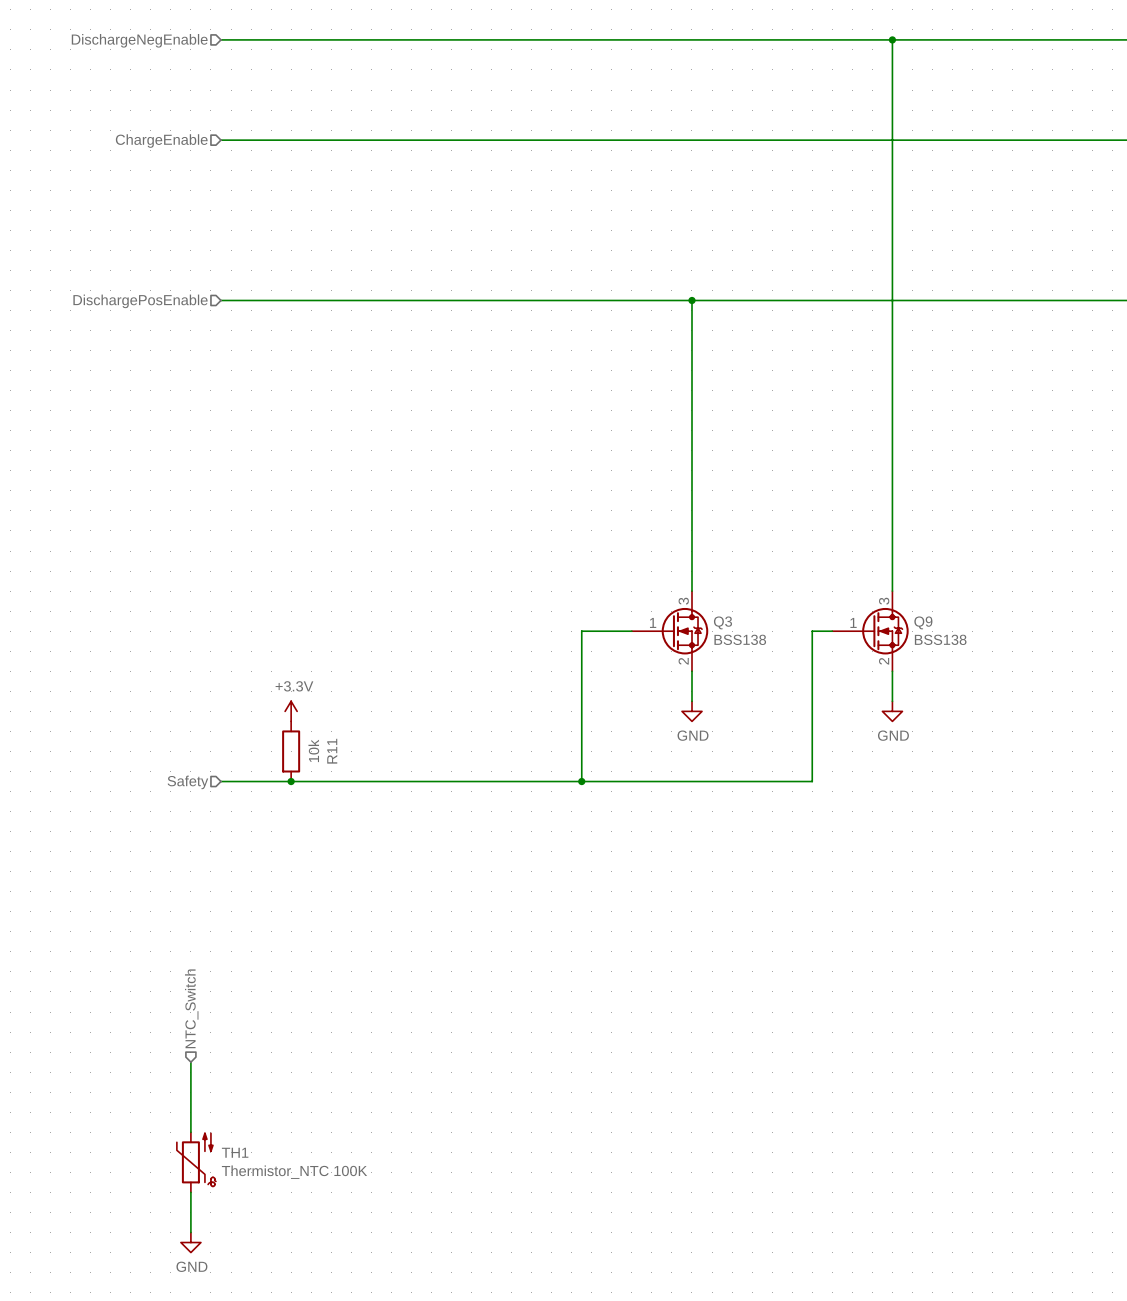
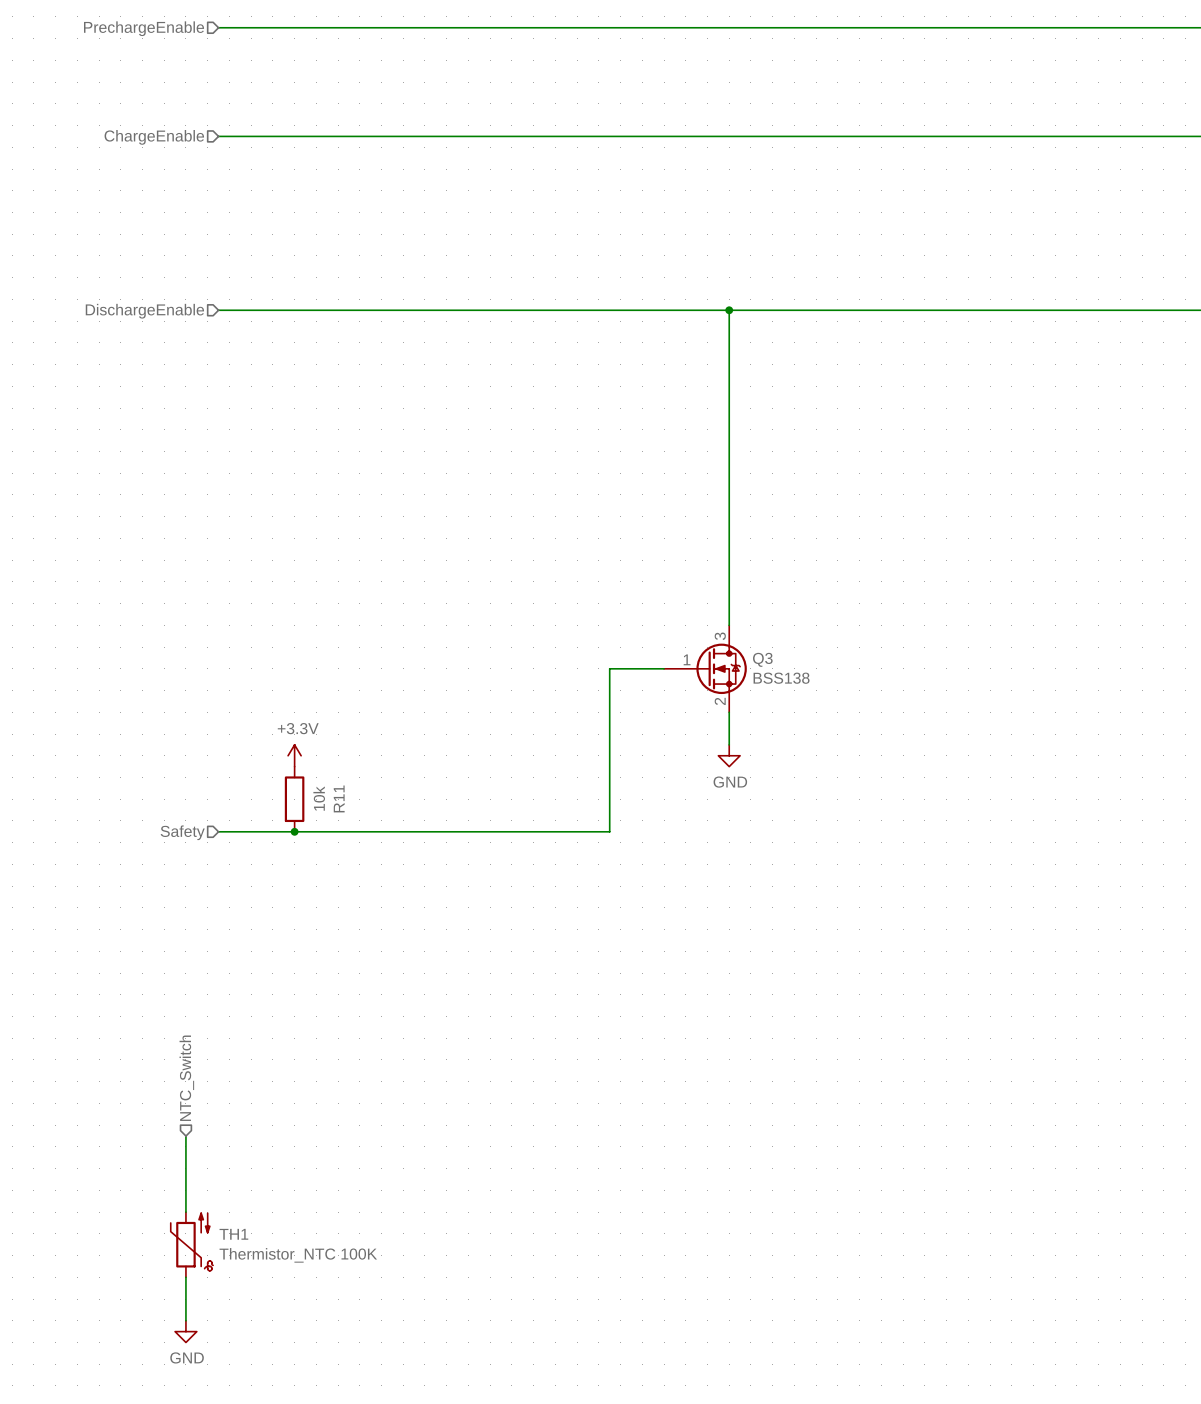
wire: (892, 39) (892, 591) -> none
junction: (892, 39) -> none
hierarchical label: DischargeNegEnable (139, 40) -> PrechargeEnable (144, 28)
hierarchical label: DischargePosEnable (140, 301) -> DischargeEnable (144, 311)
wire: (832, 631) (812, 631) (812, 781) (581, 781) -> none
Q9: BSS138 (870, 631) -> none
wire: (892, 671) (892, 701) -> none
power symbol: GND (892, 711) -> none
junction: (581, 781) -> none

